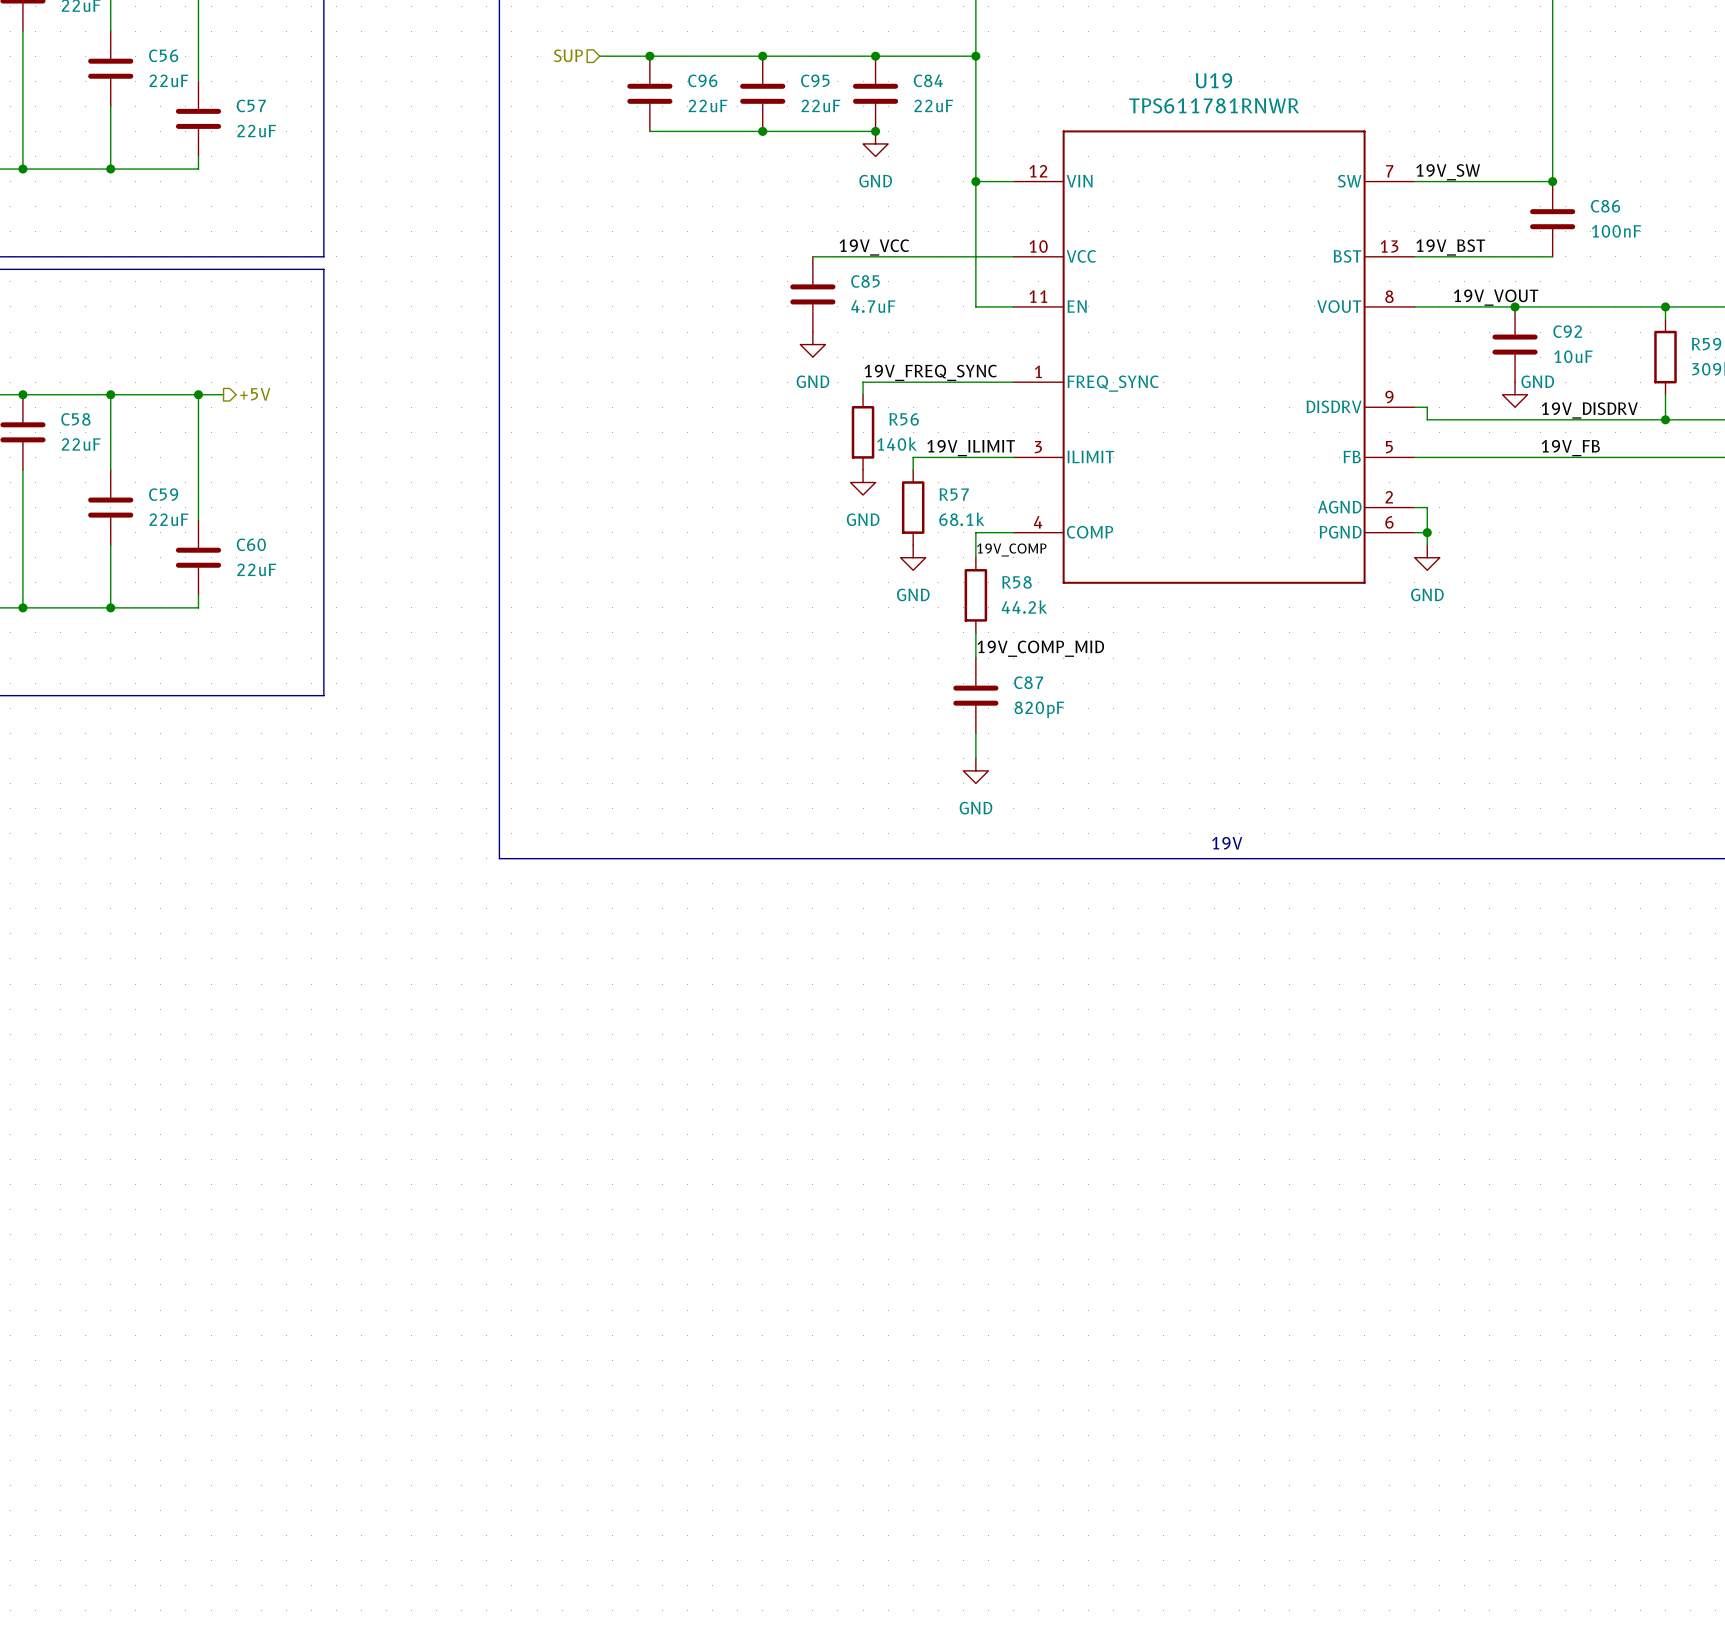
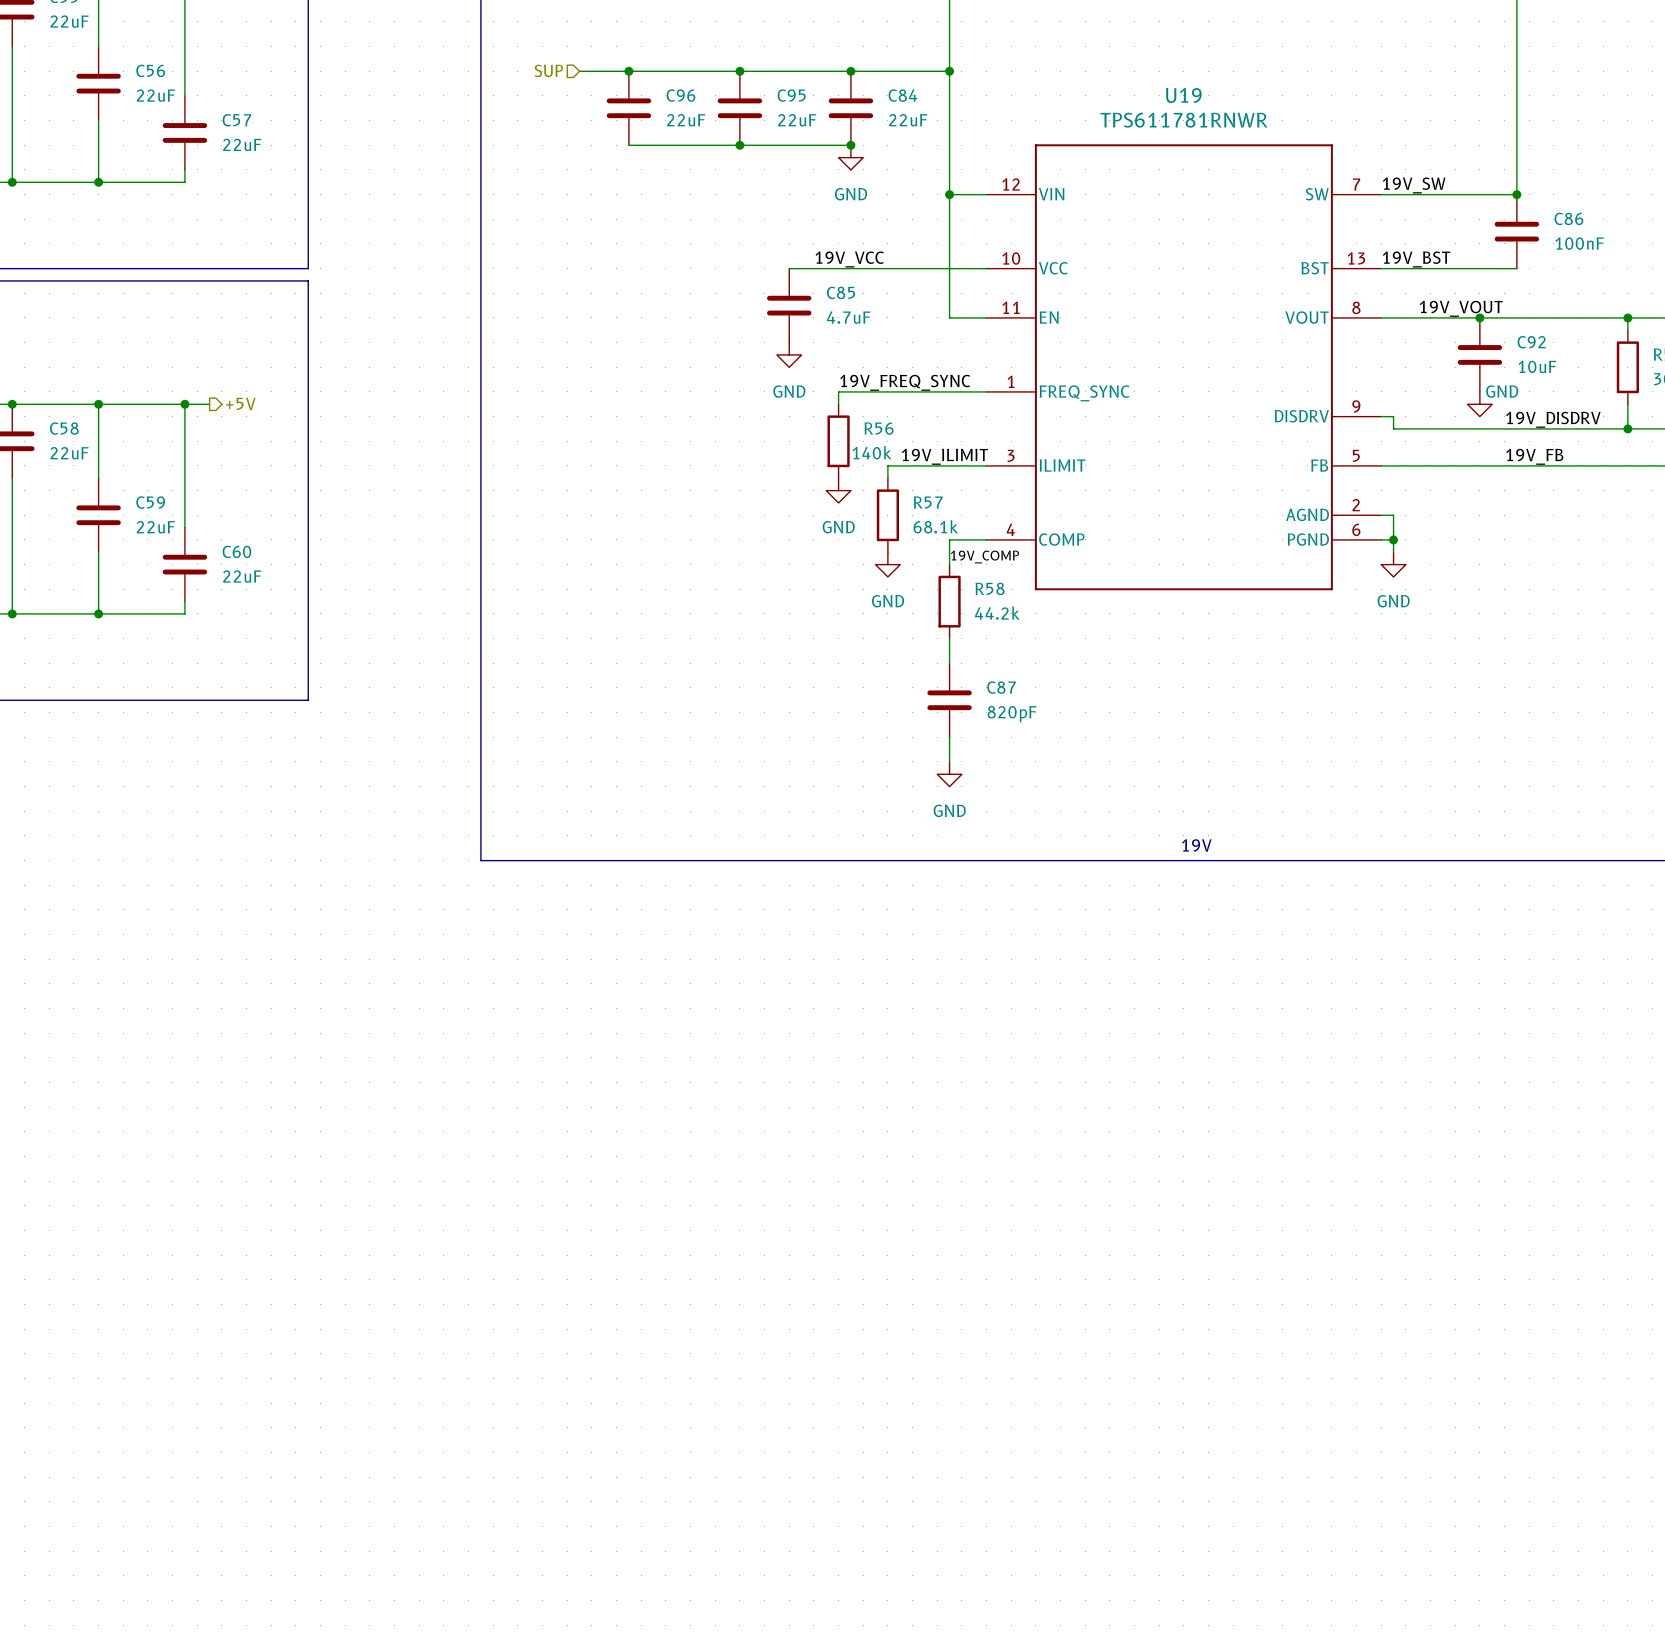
label: 19V_COMP_MID (1040, 648) -> none

